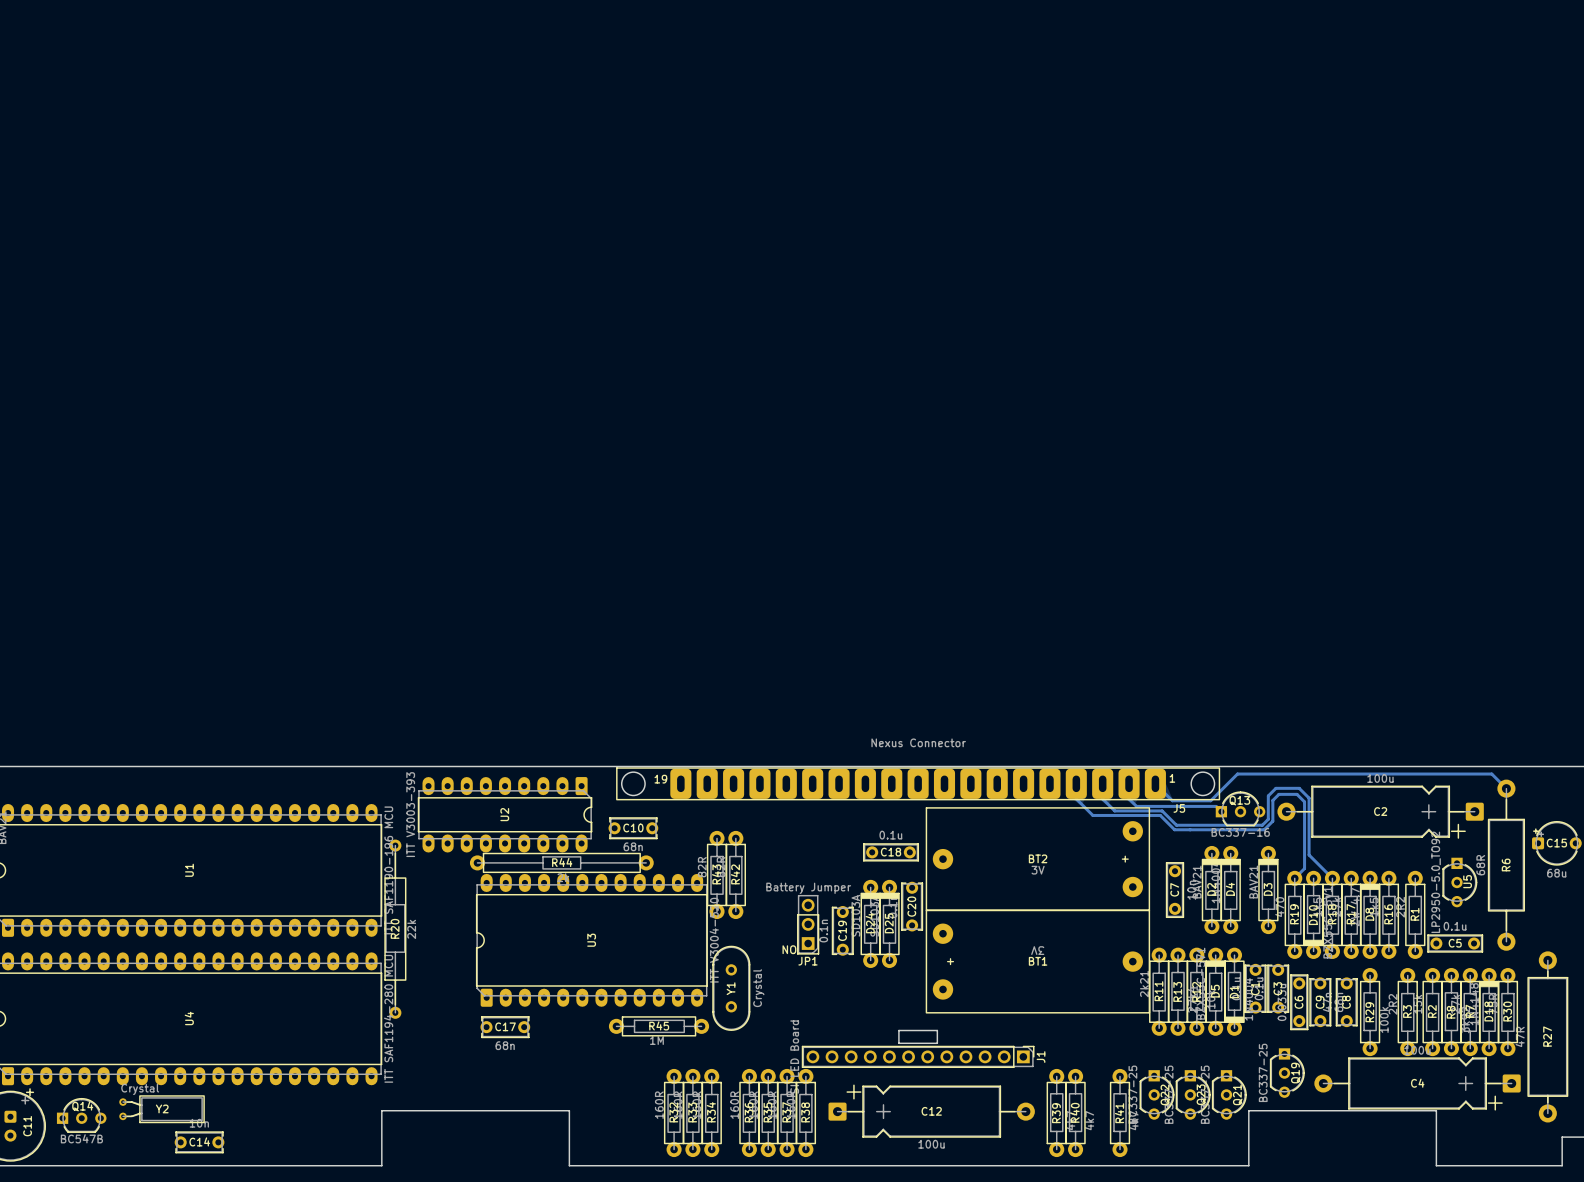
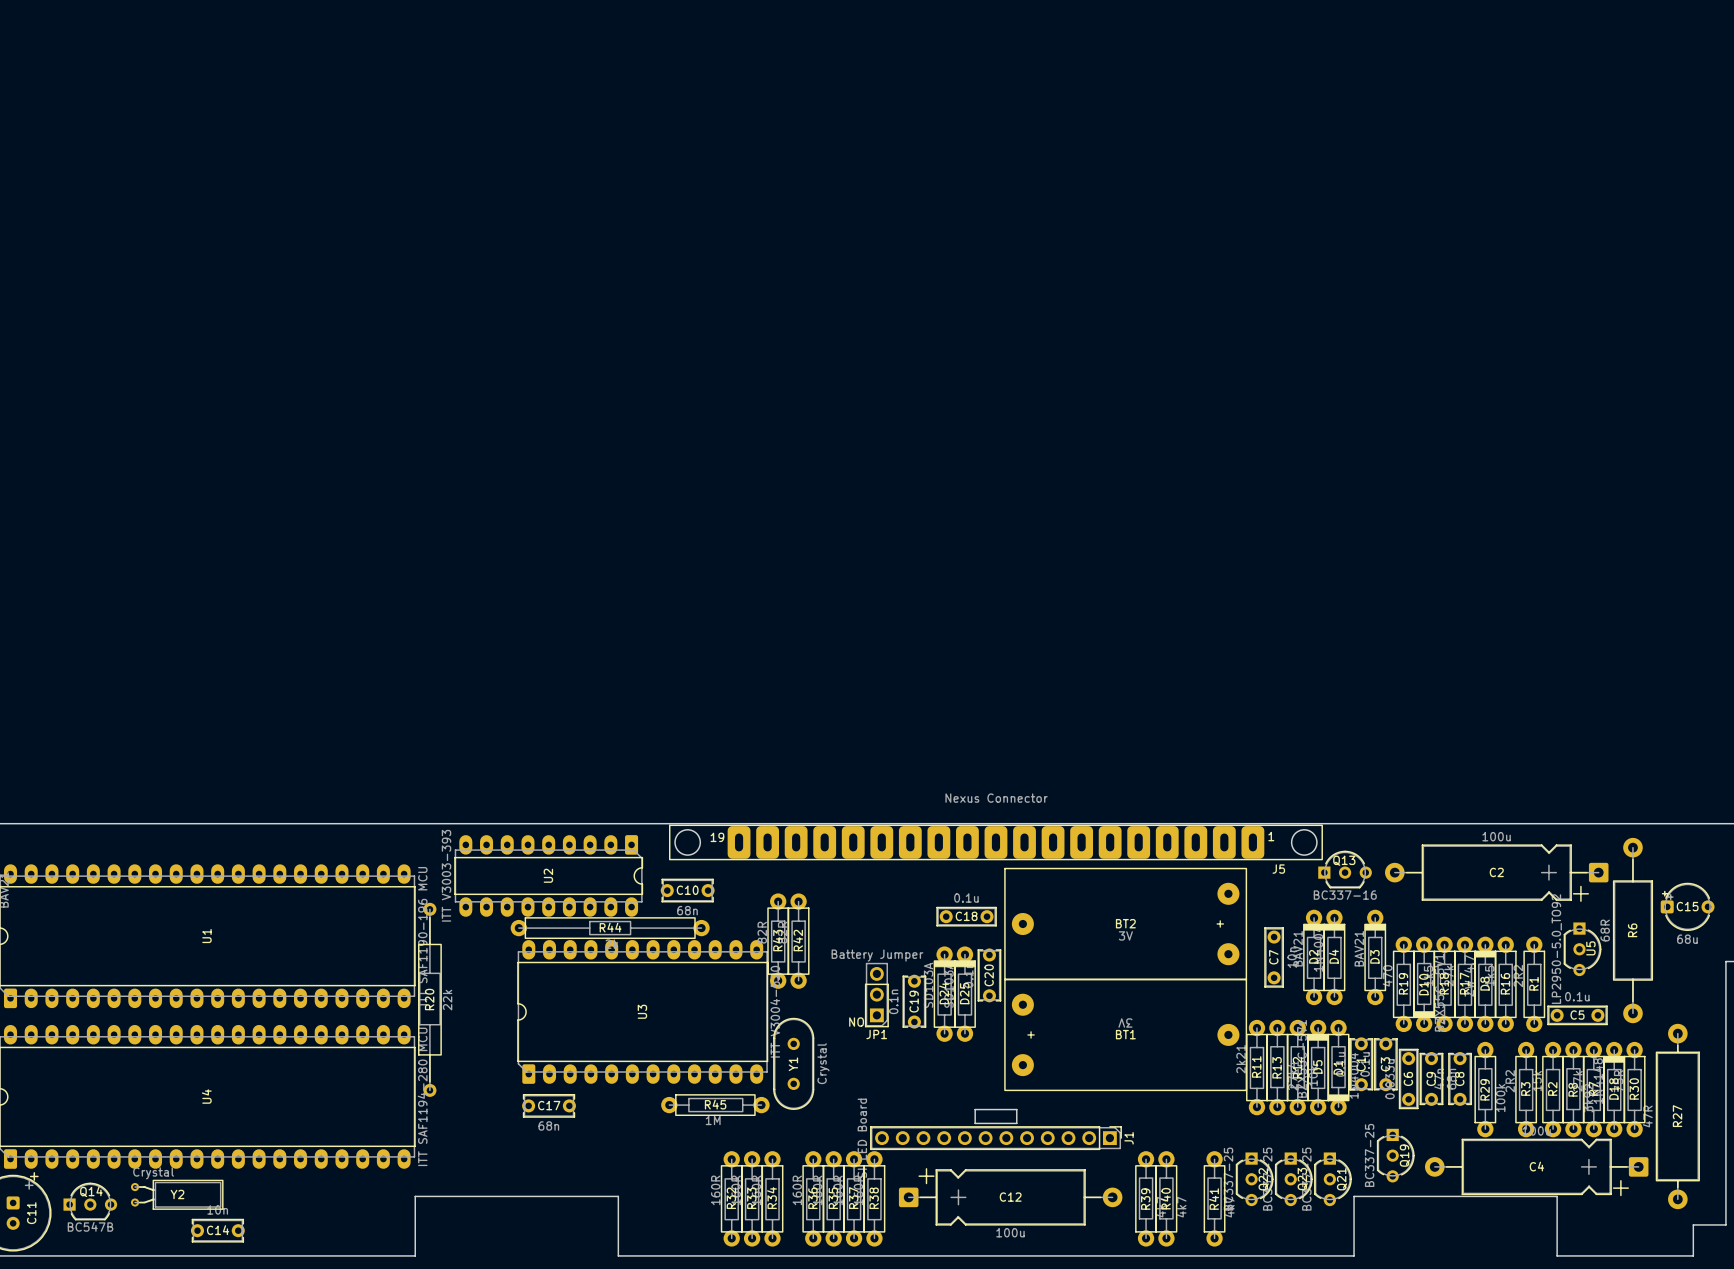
bottom track: (1076, 783) (1076, 798) (1092, 815) (1160, 815) (1174, 829) (1264, 829) (1272, 821) (1272, 800) (1278, 794) (1297, 794) (1304, 801) (1304, 868) (1294, 878) -> none
bottom track: (1102, 783) (1102, 798) (1114, 810) (1162, 810) (1176, 825) (1262, 825) (1268, 819) (1268, 795) (1275, 788) (1299, 788) (1309, 798) (1309, 855) (1332, 878) -> none
bottom track: (1129, 783) (1129, 798) (1136, 806) (1216, 806) (1221, 811) -> none
bottom track: (1155, 783) (1172, 800) (1210, 800) (1237, 774) (1491, 774) (1506, 788) -> none

